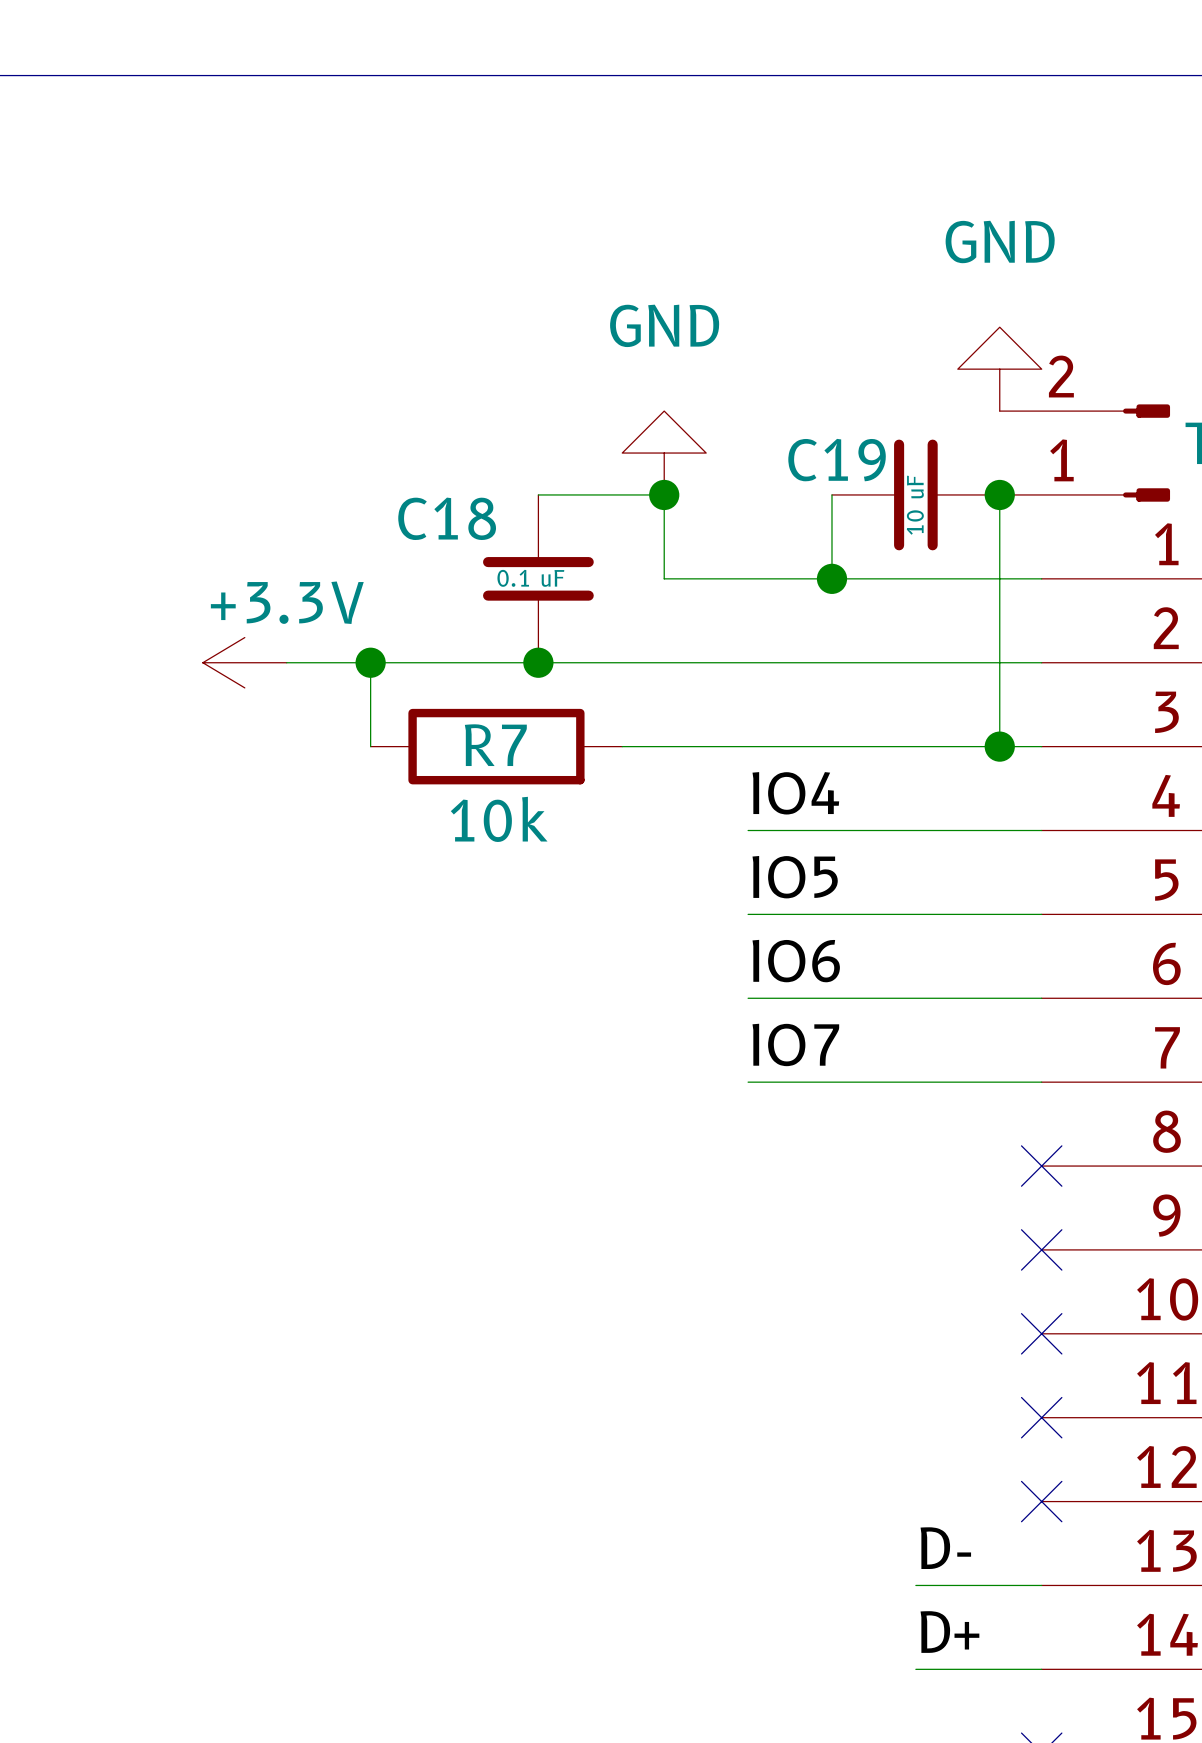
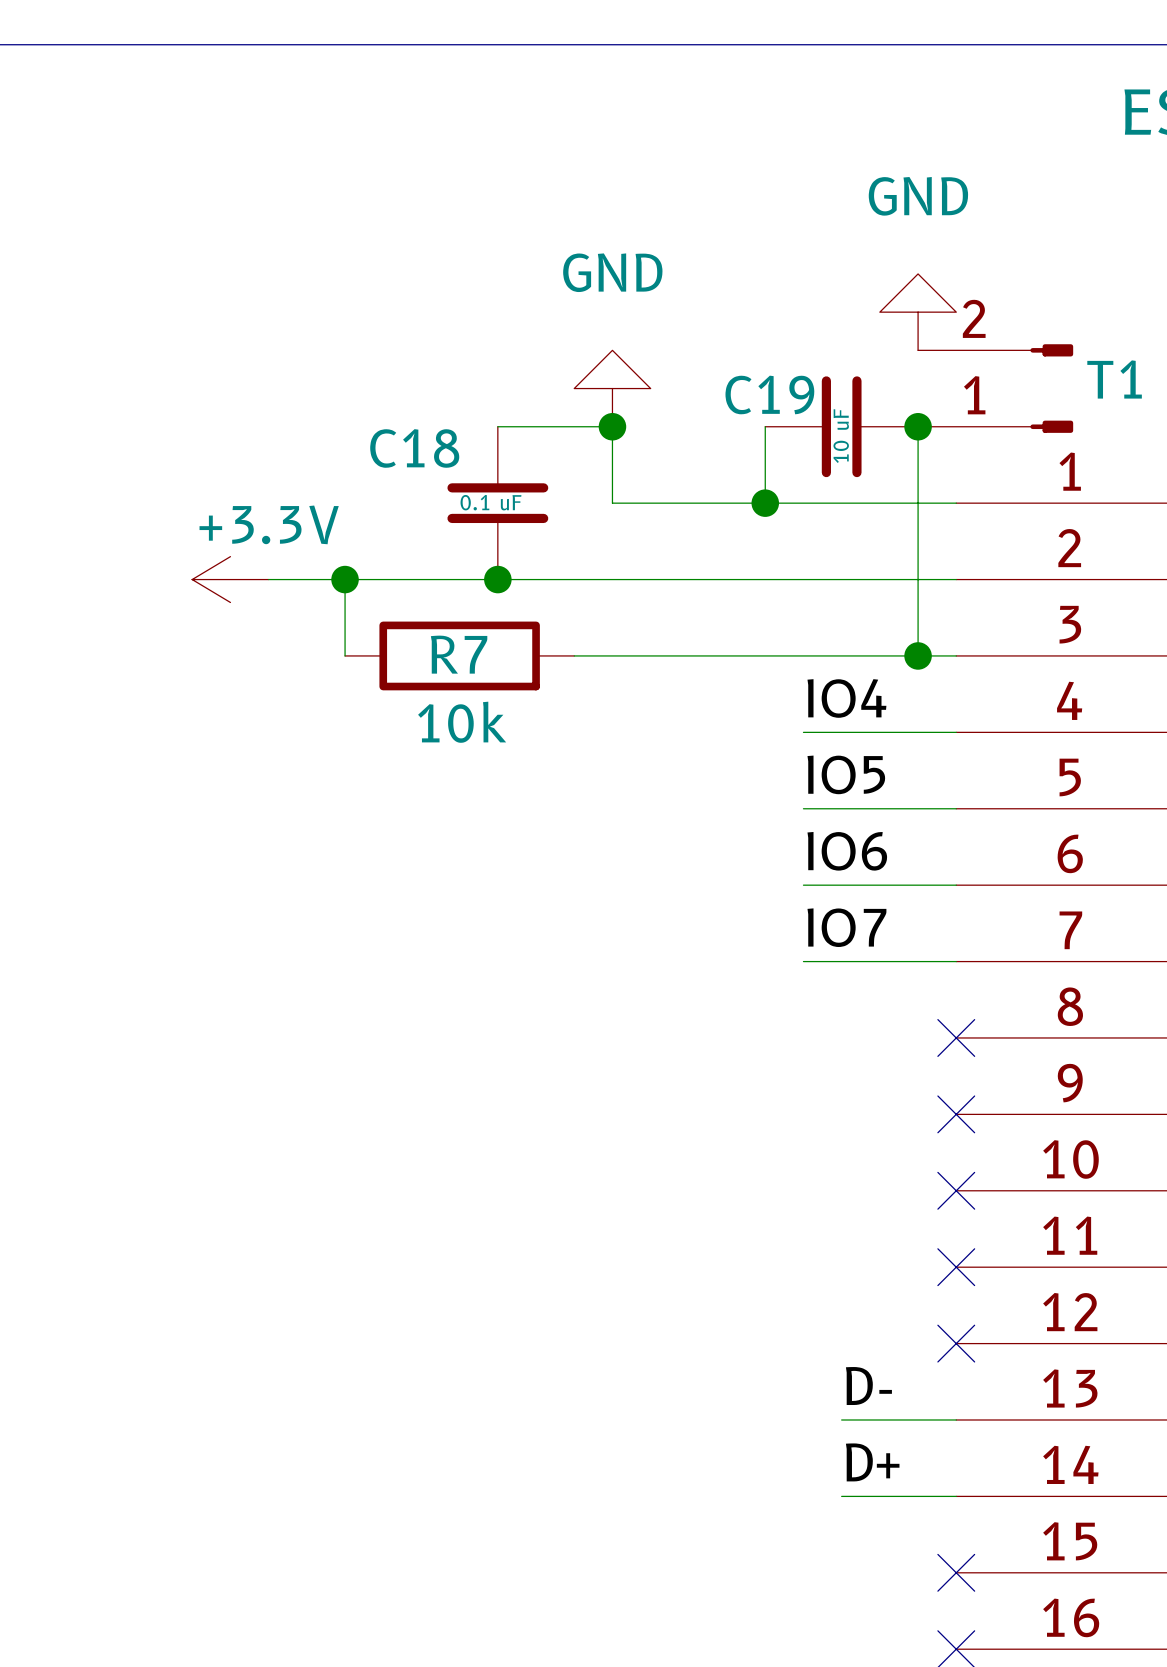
label position: IO4 (795, 793) -> IO4 (846, 698)
wire: (748, 830) (873, 830) -> none
label position: IO5 (795, 877) -> IO5 (846, 774)
wire: (748, 914) (873, 914) -> none
label position: IO6 (796, 961) -> IO6 (847, 851)
wire: (748, 998) (873, 998) -> none
label position: IO7 (795, 1044) -> IO7 (846, 927)
wire: (748, 1082) (873, 1082) -> none

